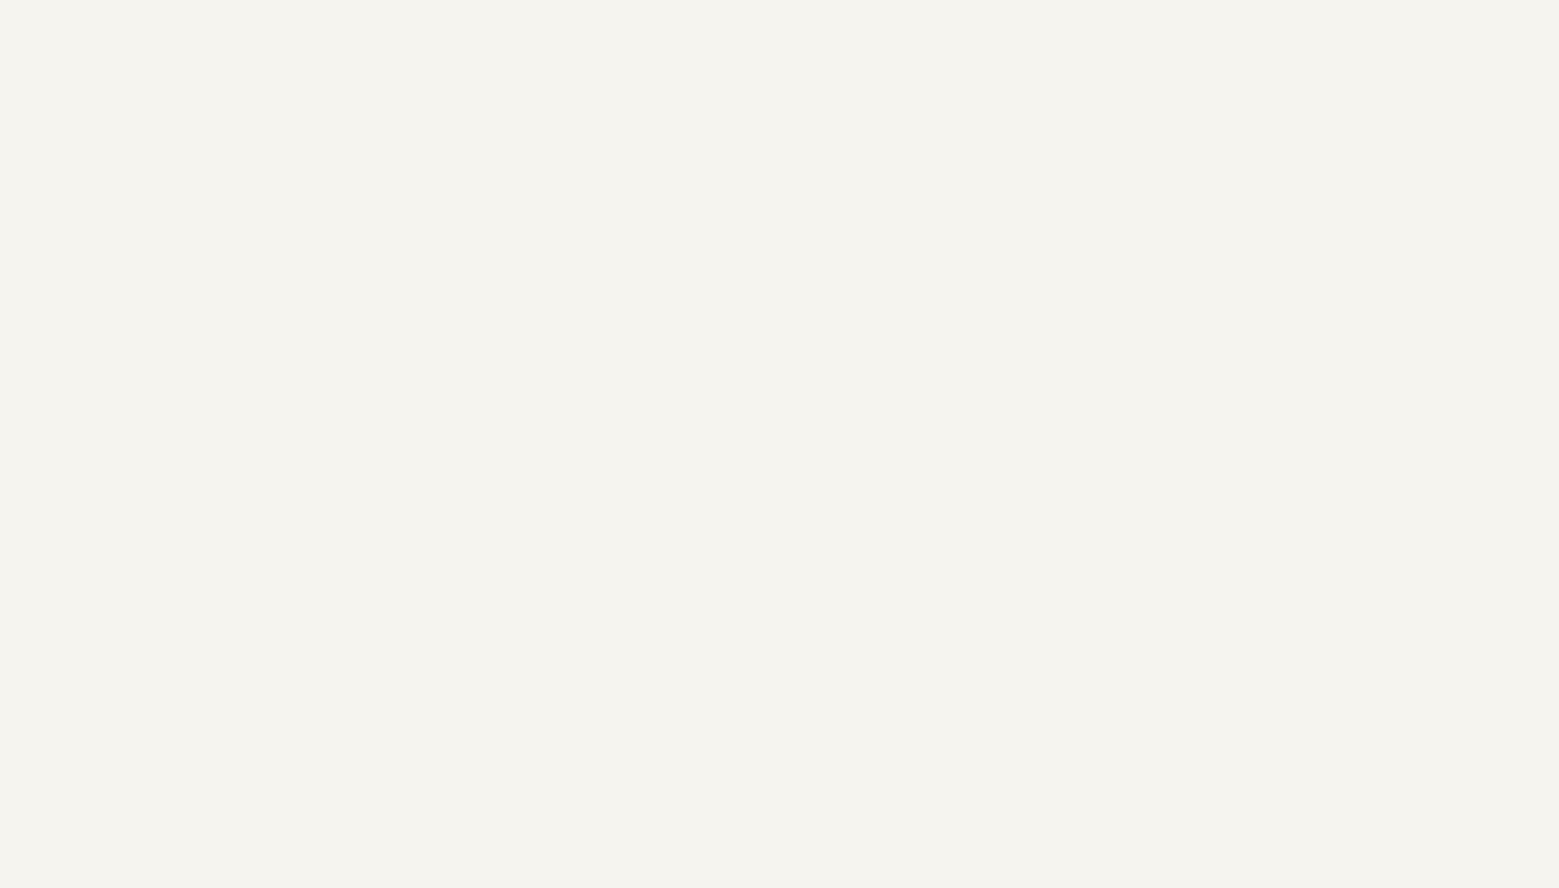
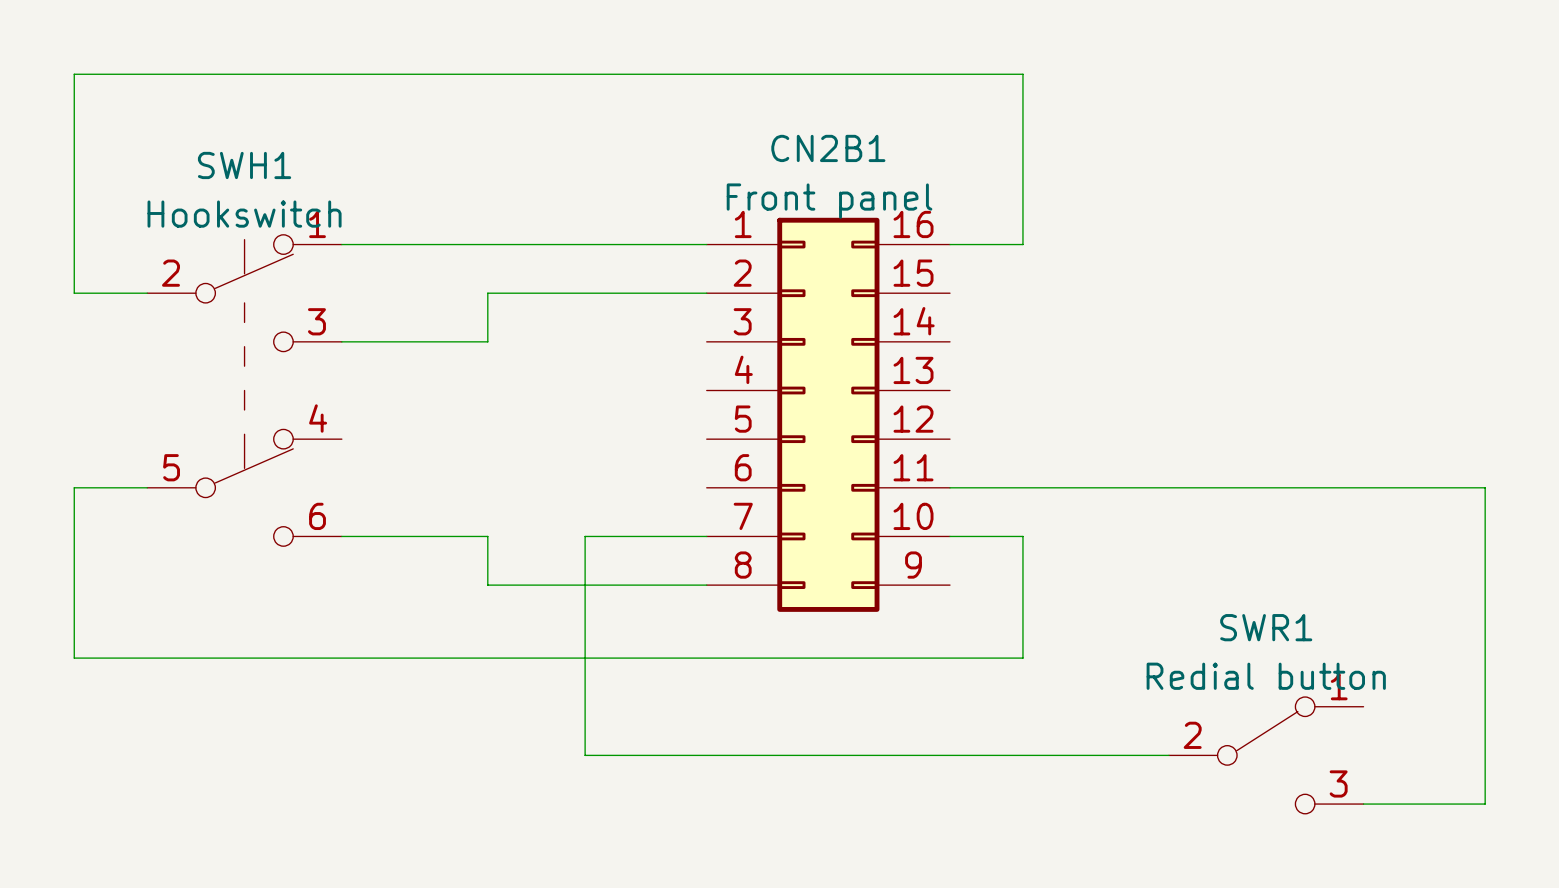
wire: none -> (341, 244) (706, 244)
wire: none -> (950, 244) (1022, 244) (1022, 74) (74, 74) (74, 293) (147, 293)
wire: none -> (706, 293) (487, 293) (487, 341) (341, 341)
SWH1: none -> Hookswitch (244, 390)
CN2B1: none -> Front panel (828, 414)
wire: none -> (147, 487) (74, 487) (74, 658) (1022, 658) (1022, 536) (950, 536)
wire: none -> (950, 487) (1485, 487) (1485, 804) (1363, 804)
wire: none -> (341, 536) (487, 536) (487, 585) (706, 585)
wire: none -> (706, 536) (585, 536) (585, 755) (1168, 755)
SWR1: none -> Redial button (1266, 755)

